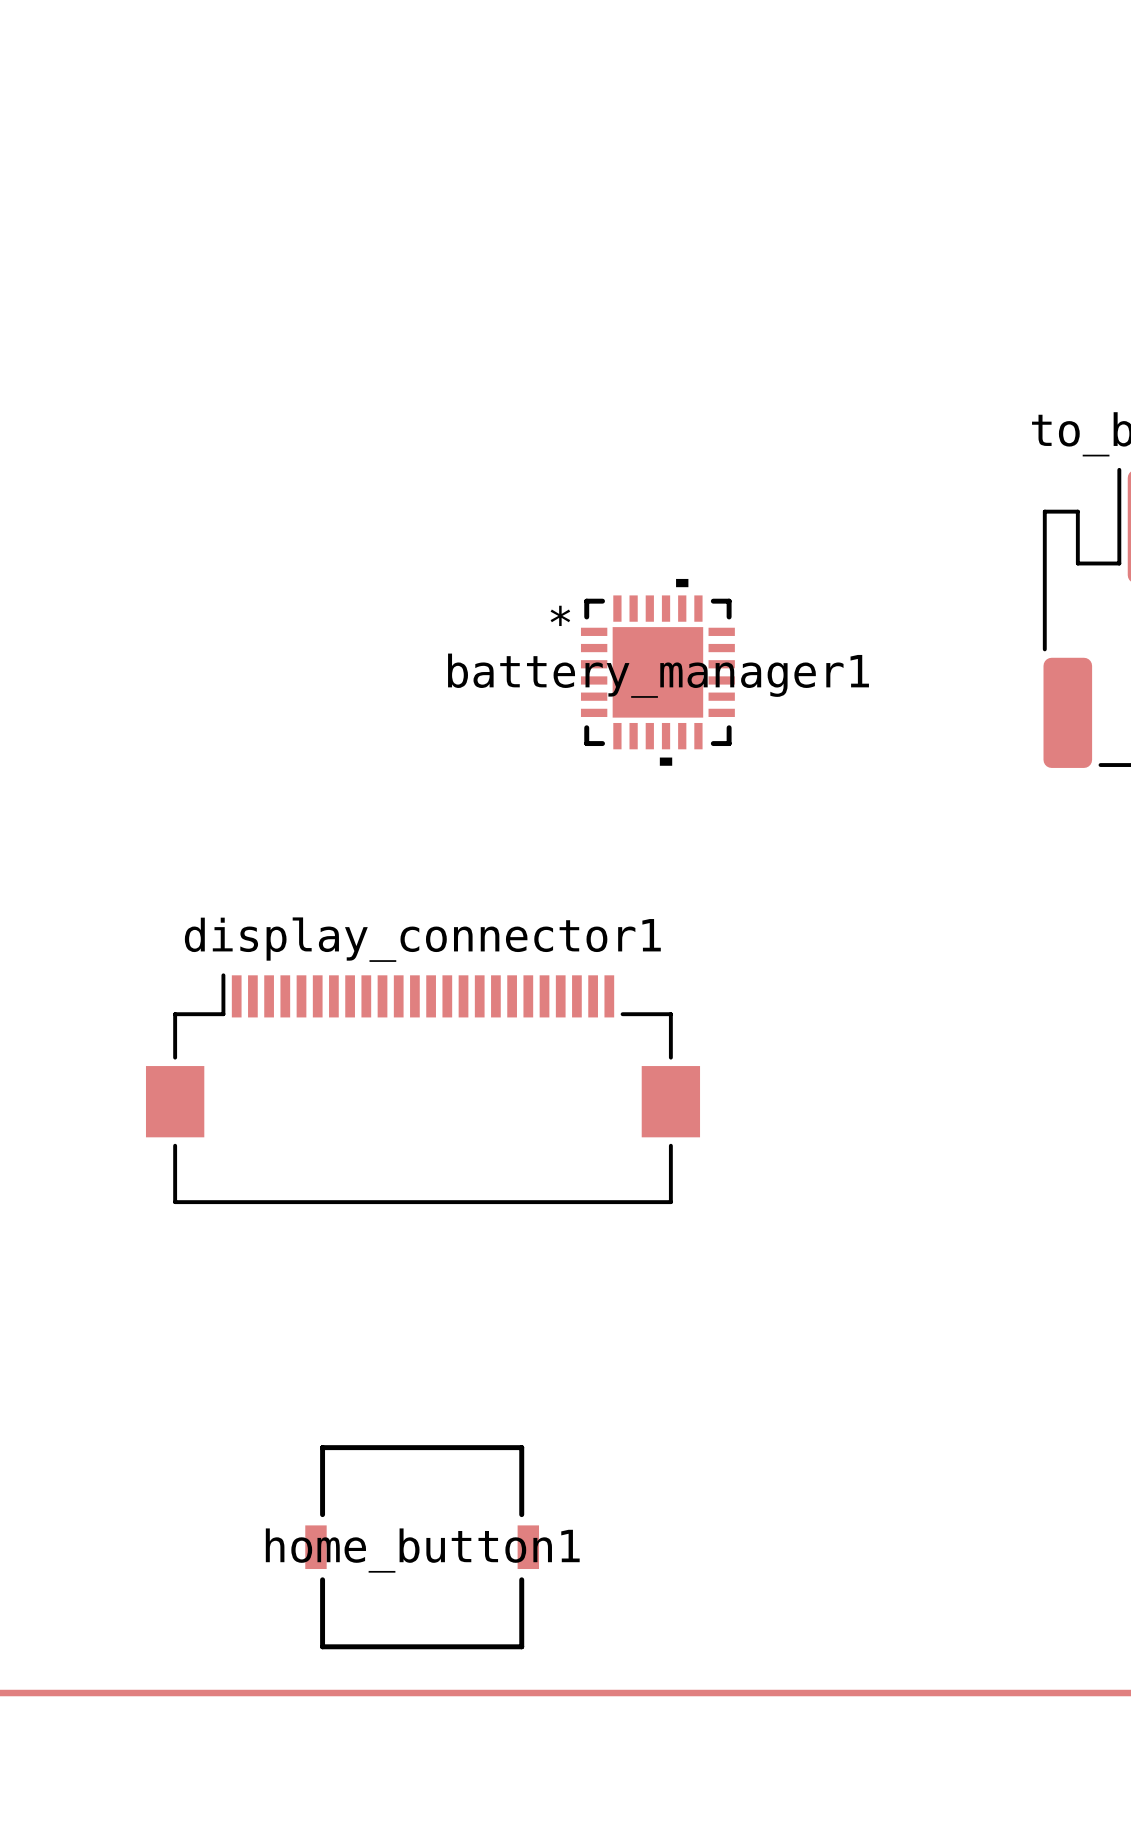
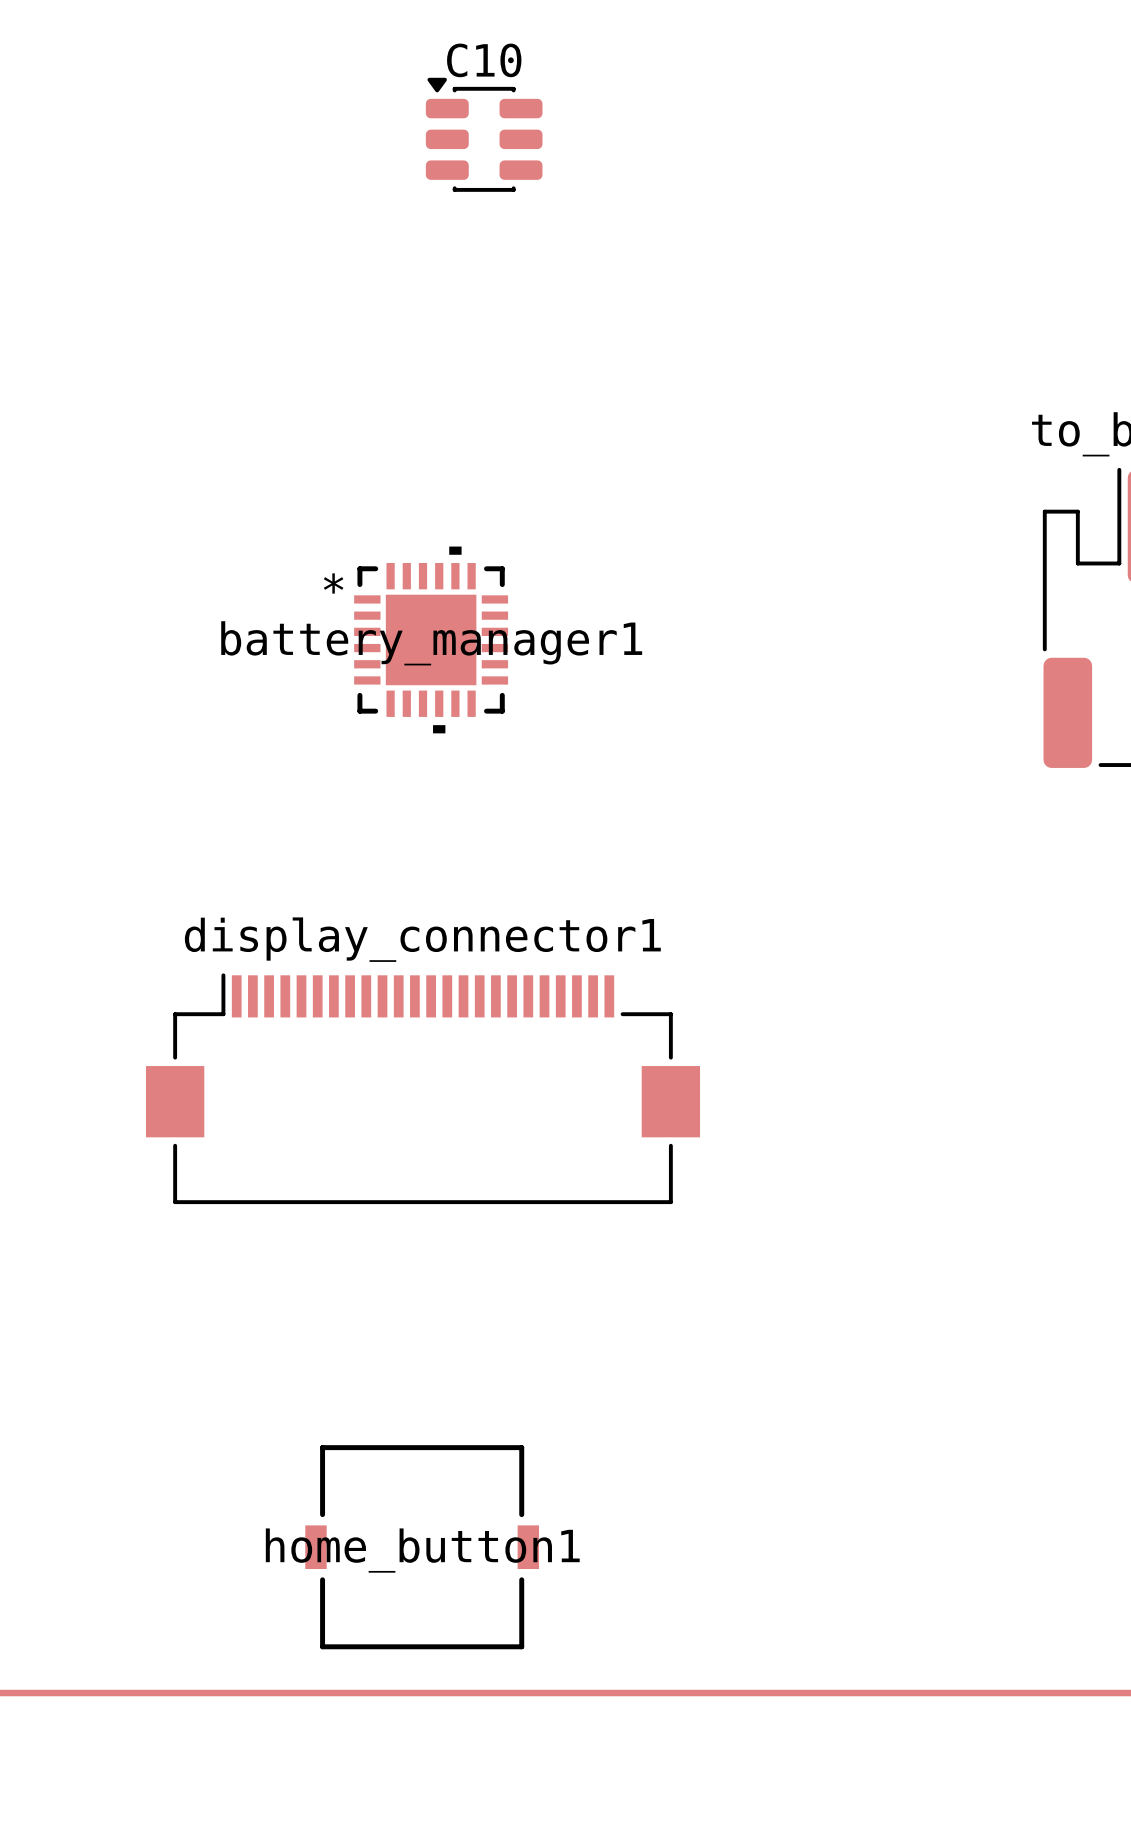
C10: none -> (484, 134)
battery_manager1 position: (657, 672) -> (431, 639)

